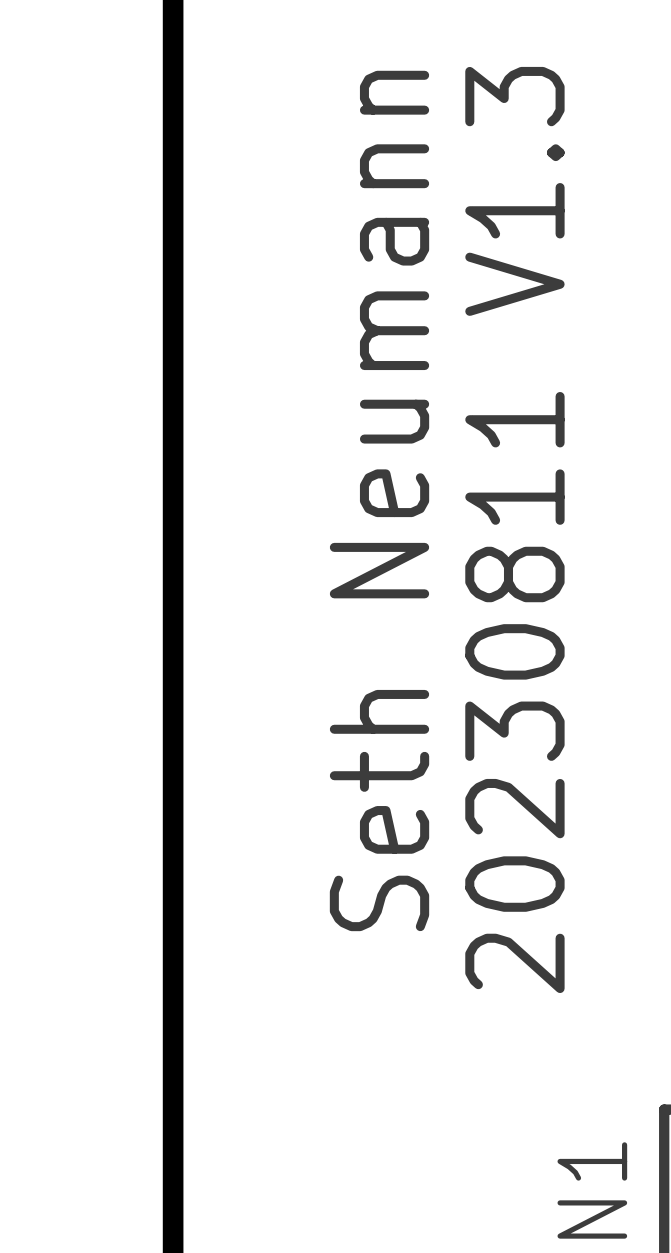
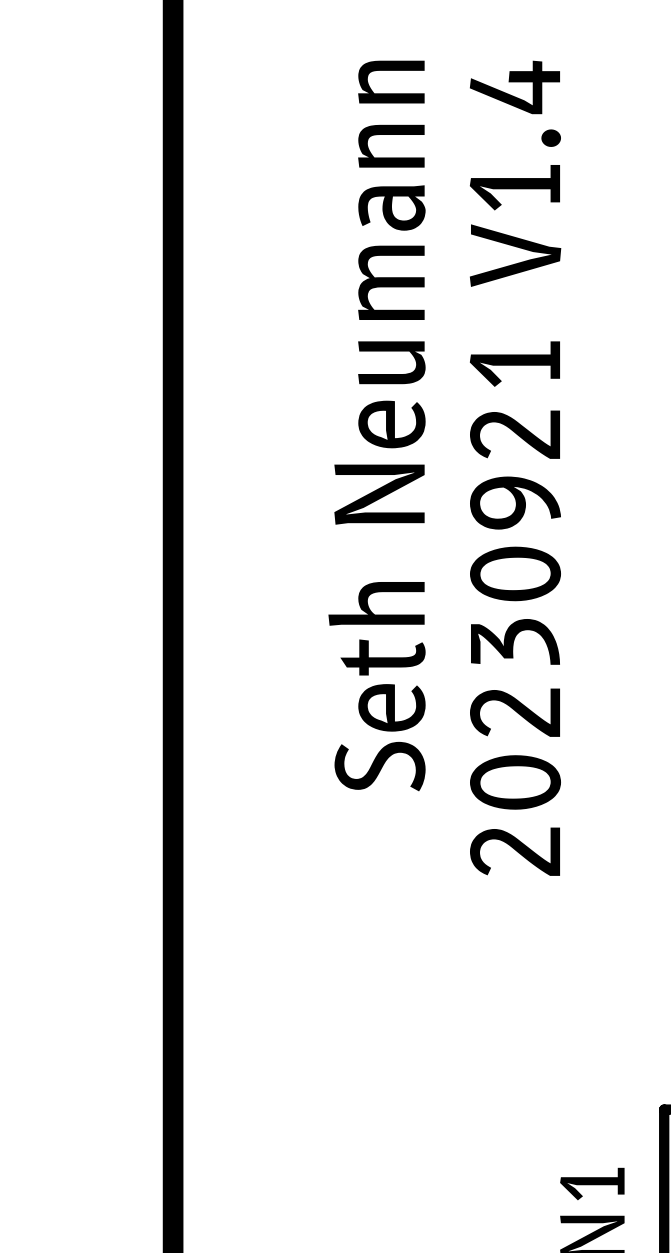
text: 20230811 V1.3 (514, 529) -> 20230921 V1.4 (515, 468)

